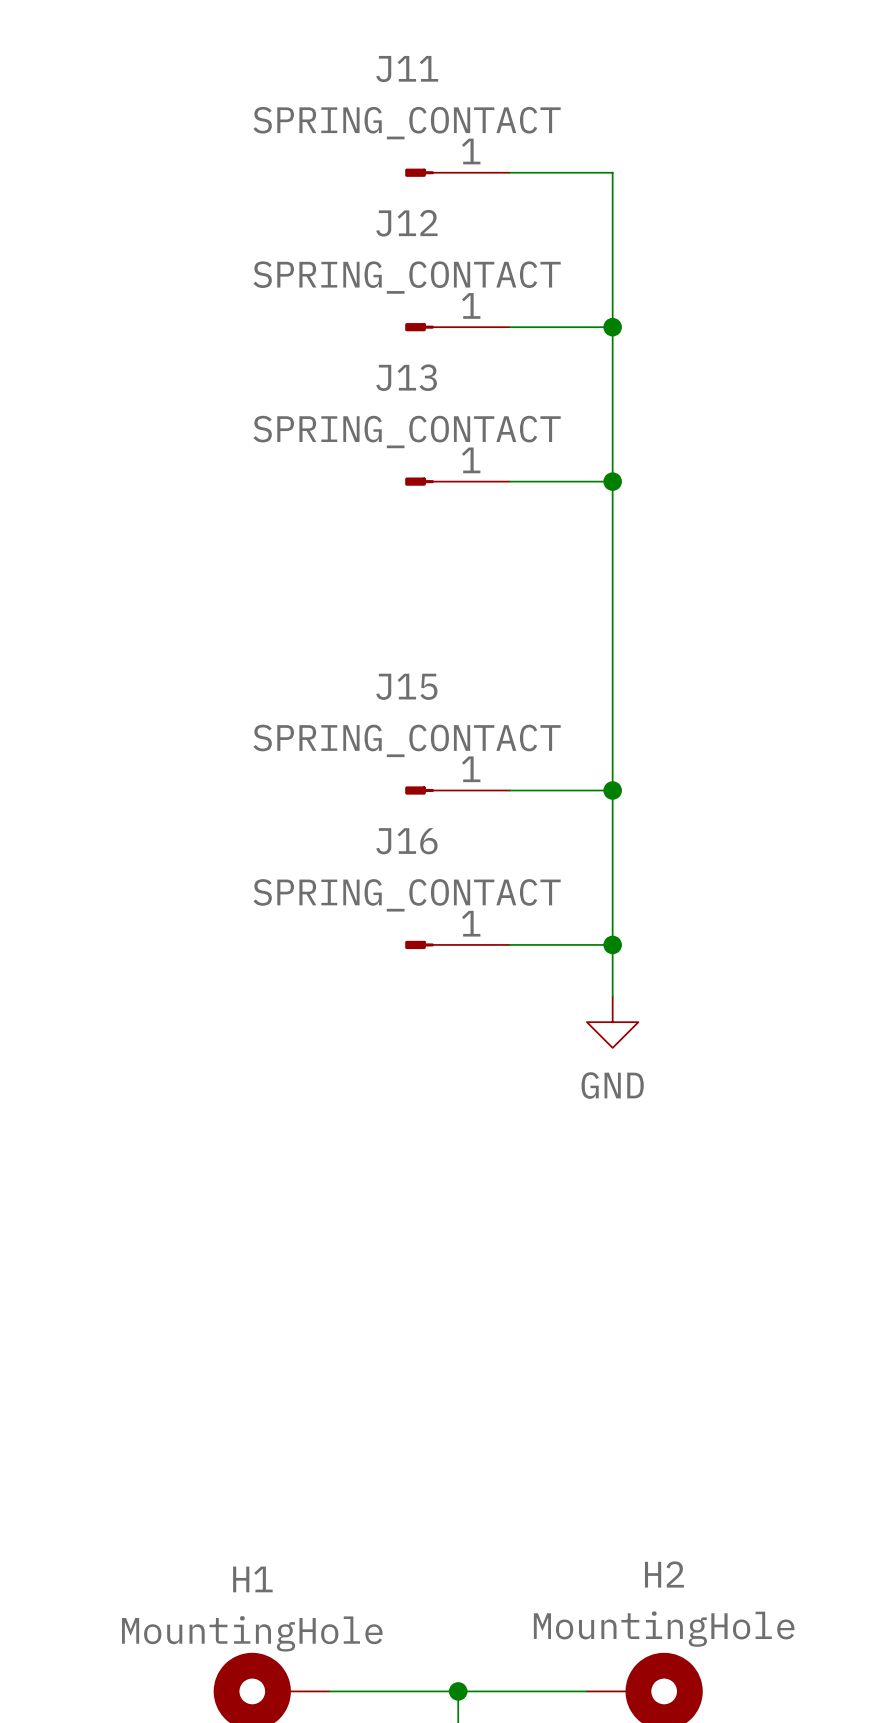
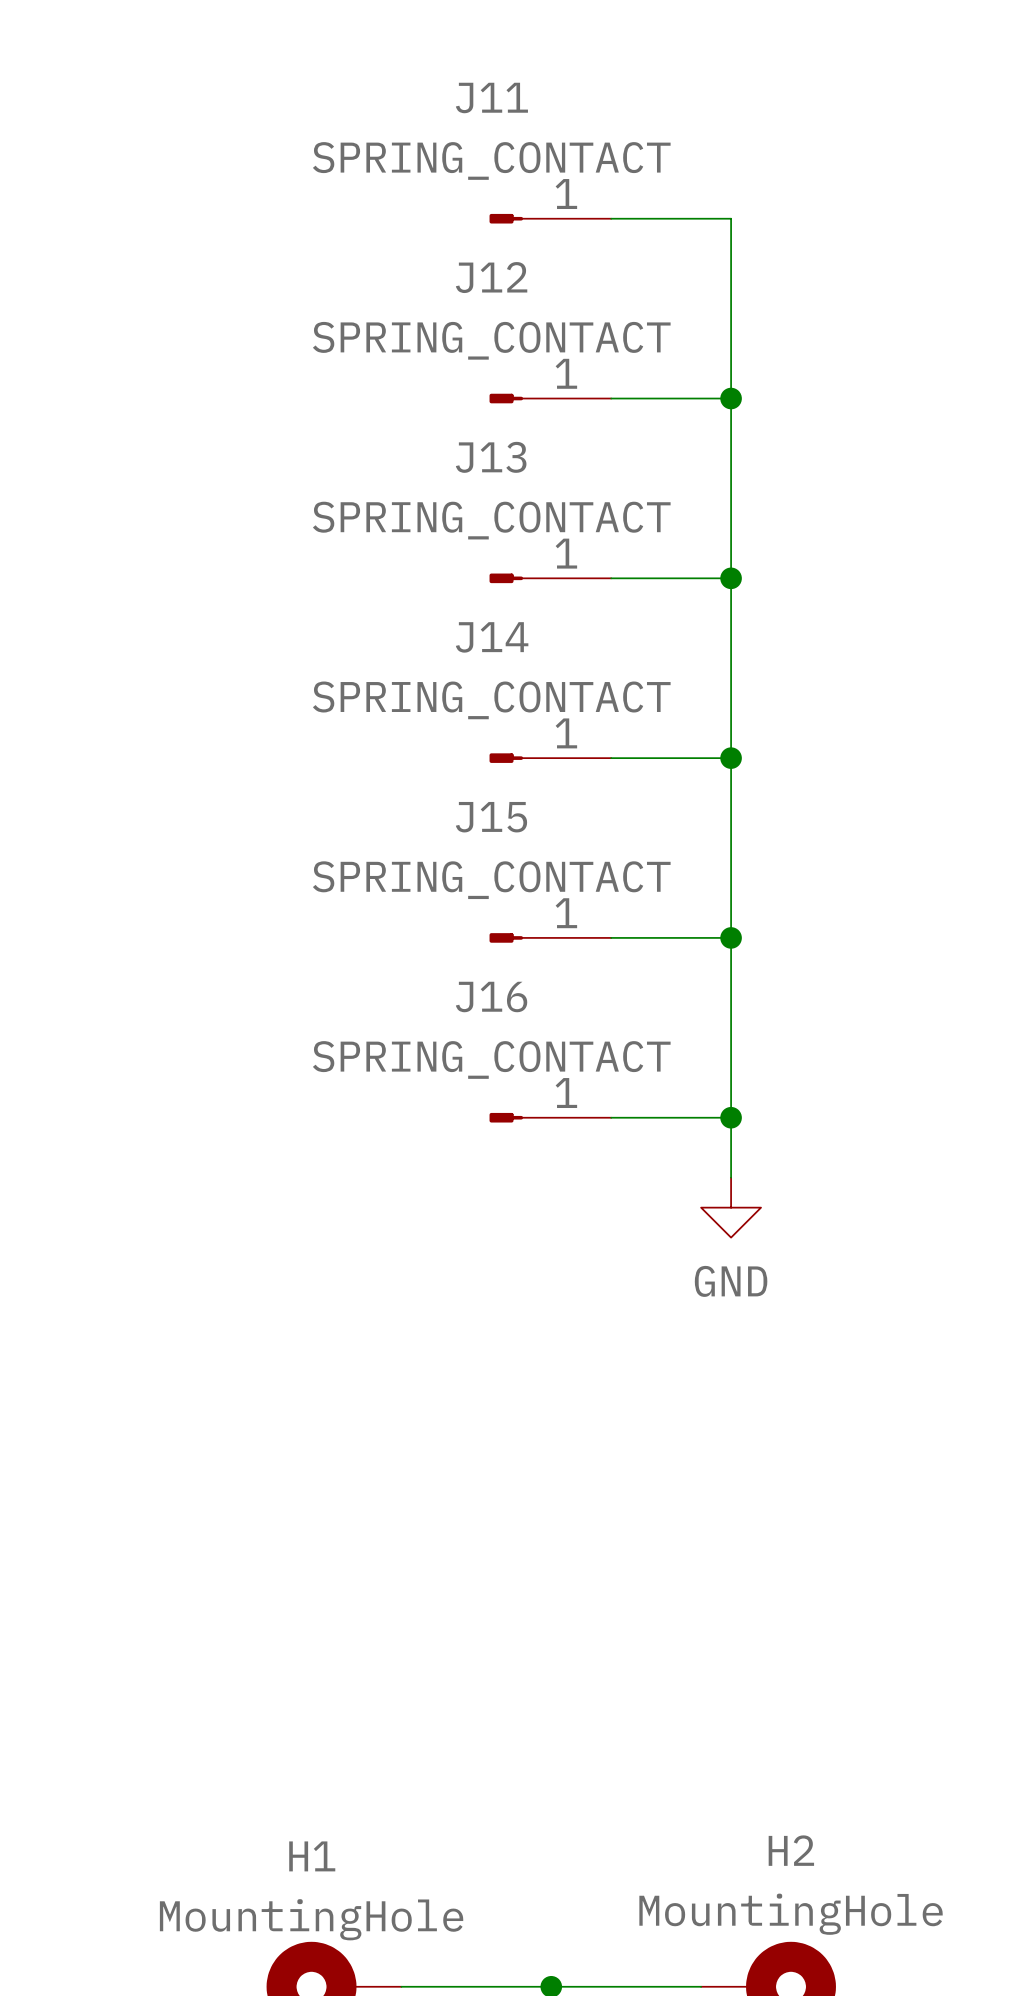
J14: none -> SPRING_CONTACT (550, 758)
wire: none -> (611, 758) (731, 758)
junction: none -> (731, 758)

